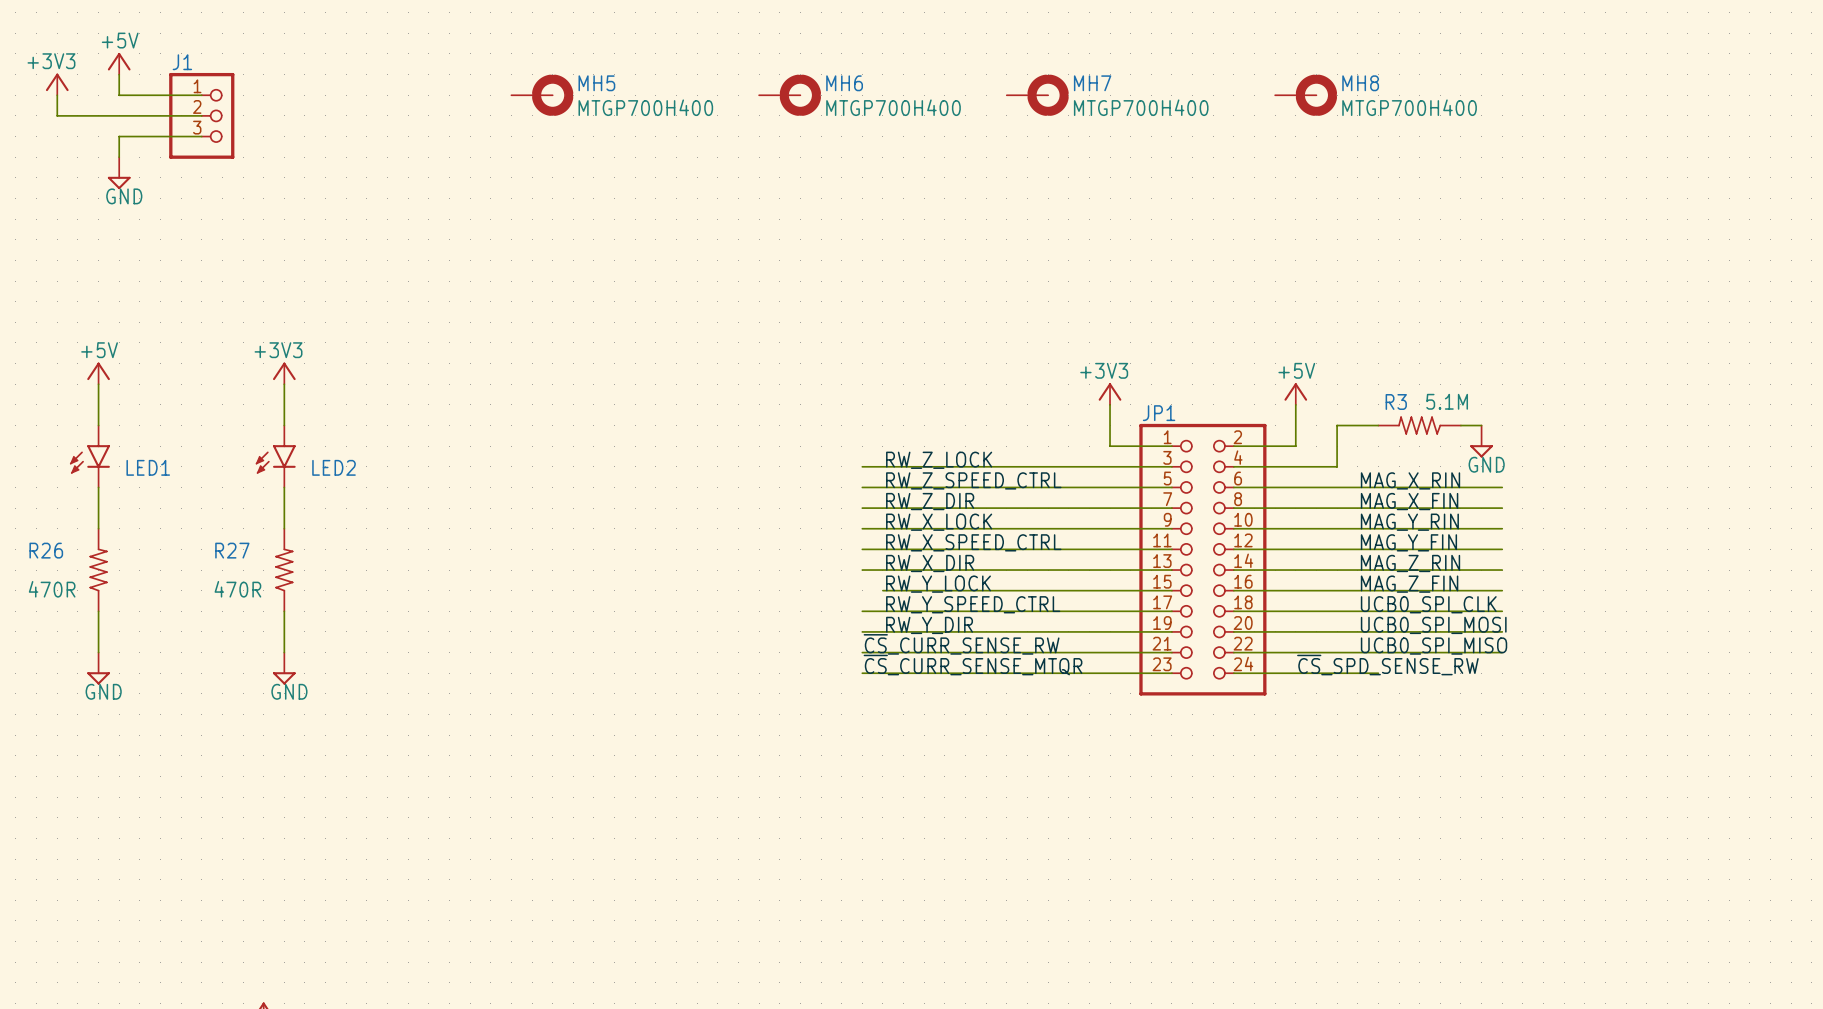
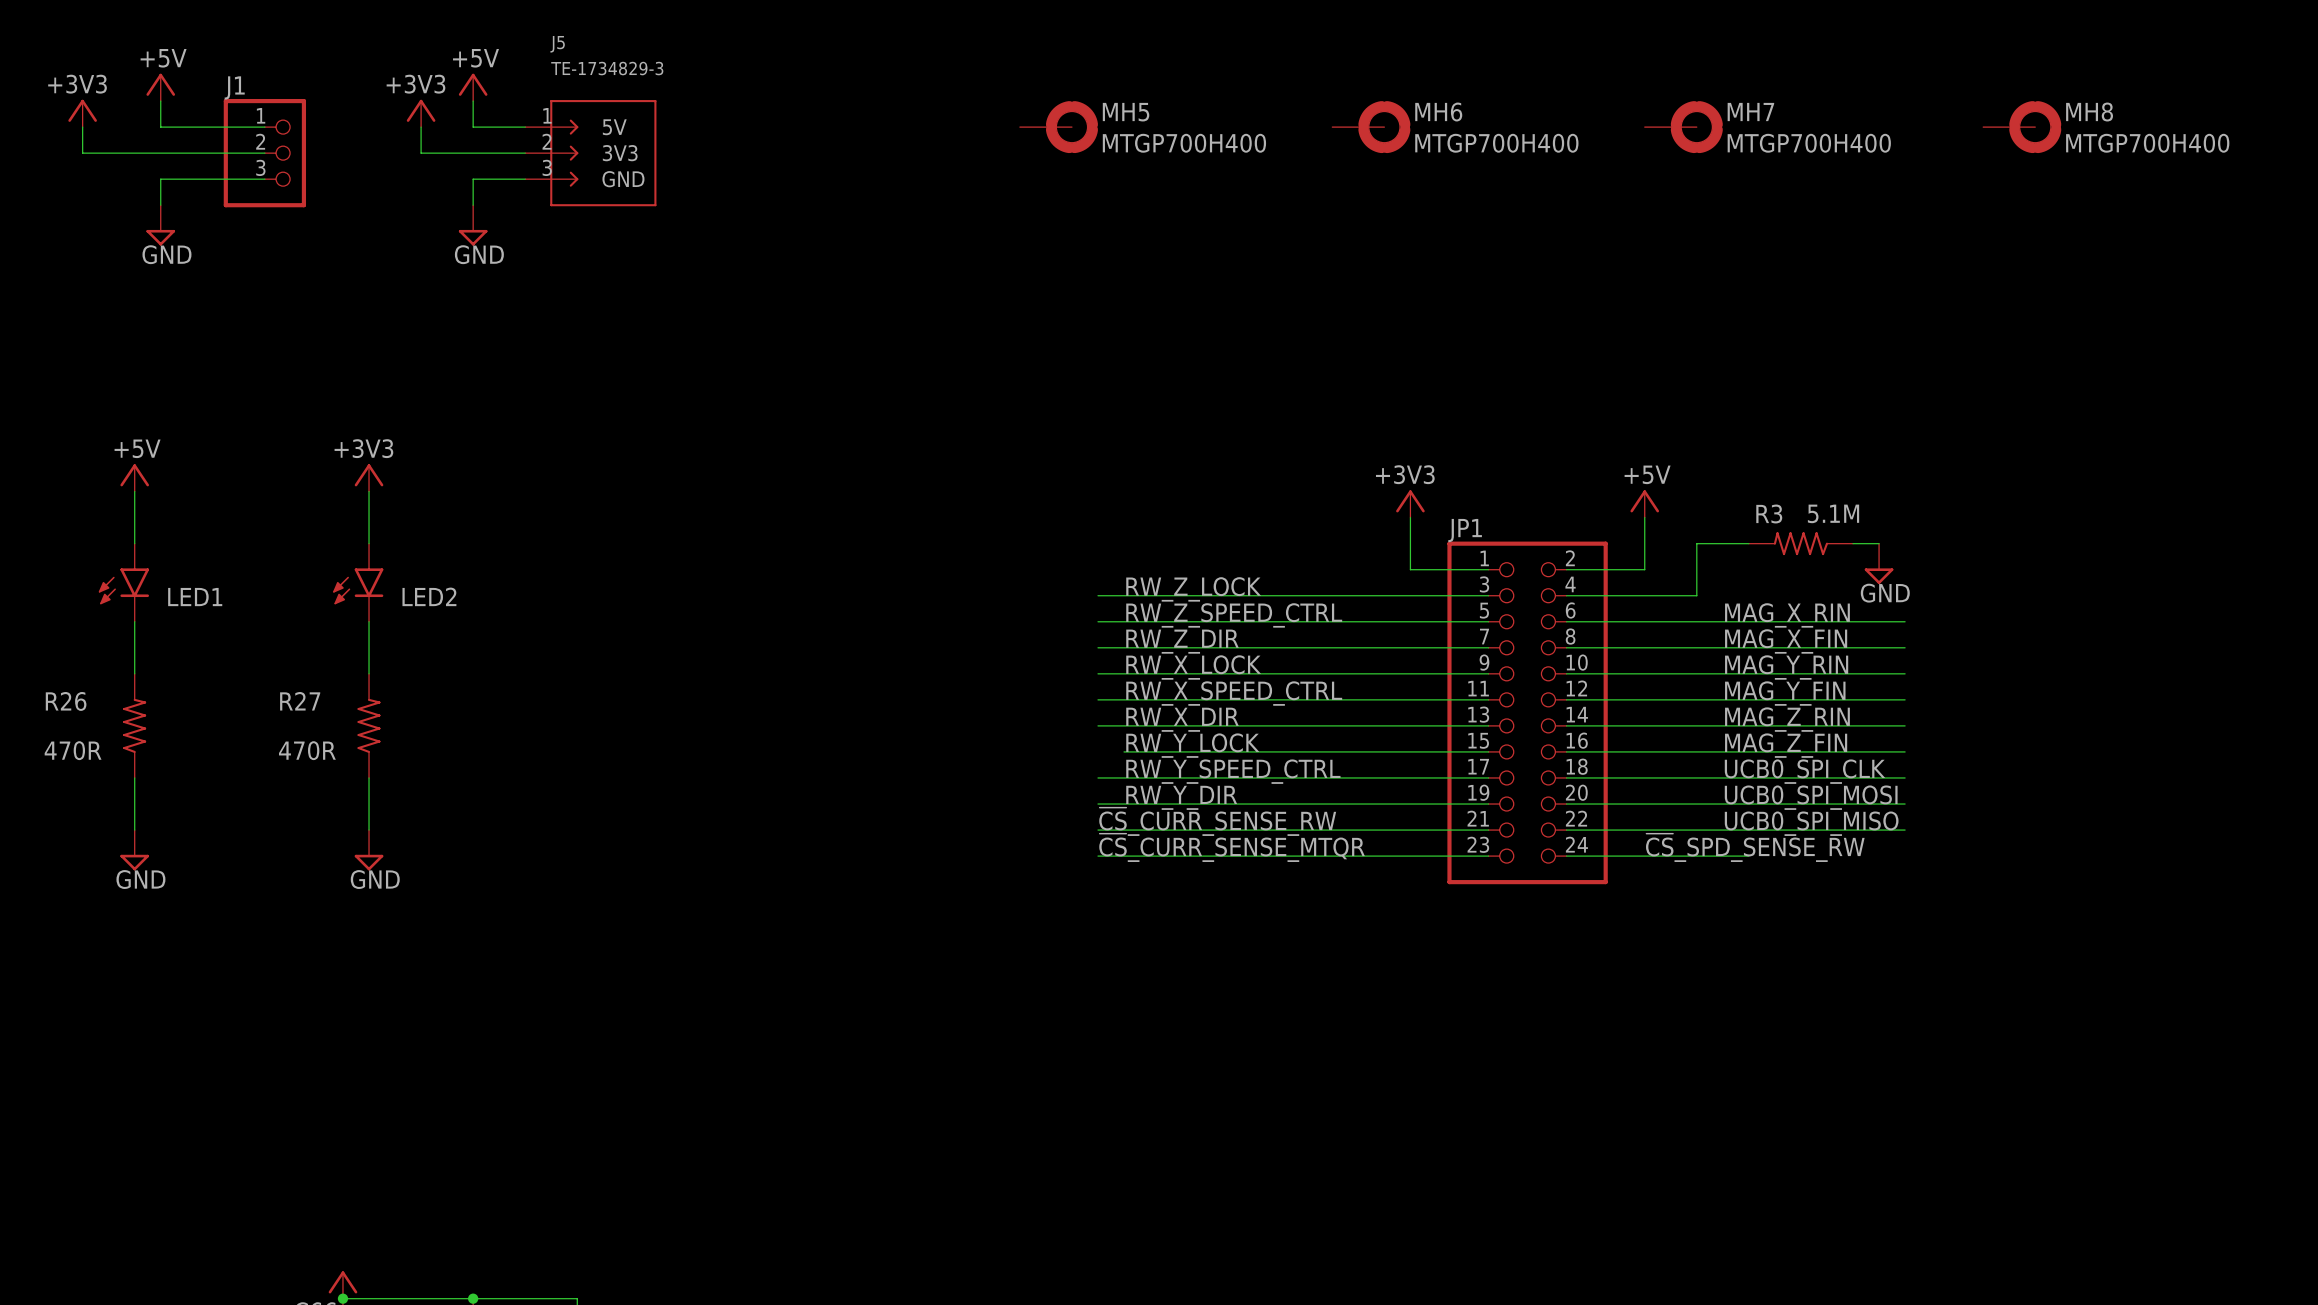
power symbol: none -> +5V (473, 87)
wire: none -> (473, 101) (473, 127) (525, 127)
power symbol: none -> +3V3 (421, 113)
wire: none -> (421, 127) (421, 153) (525, 153)
MH5 position: (542, 95) -> (1058, 127)
MH6 position: (790, 95) -> (1371, 127)
MH7 position: (1037, 95) -> (1683, 127)
MH8 position: (1306, 95) -> (2022, 127)
J5: none -> TE-1734829-3 (590, 153)
wire: none -> (525, 179) (473, 179) (473, 205)
power symbol: none -> GND (473, 225)

